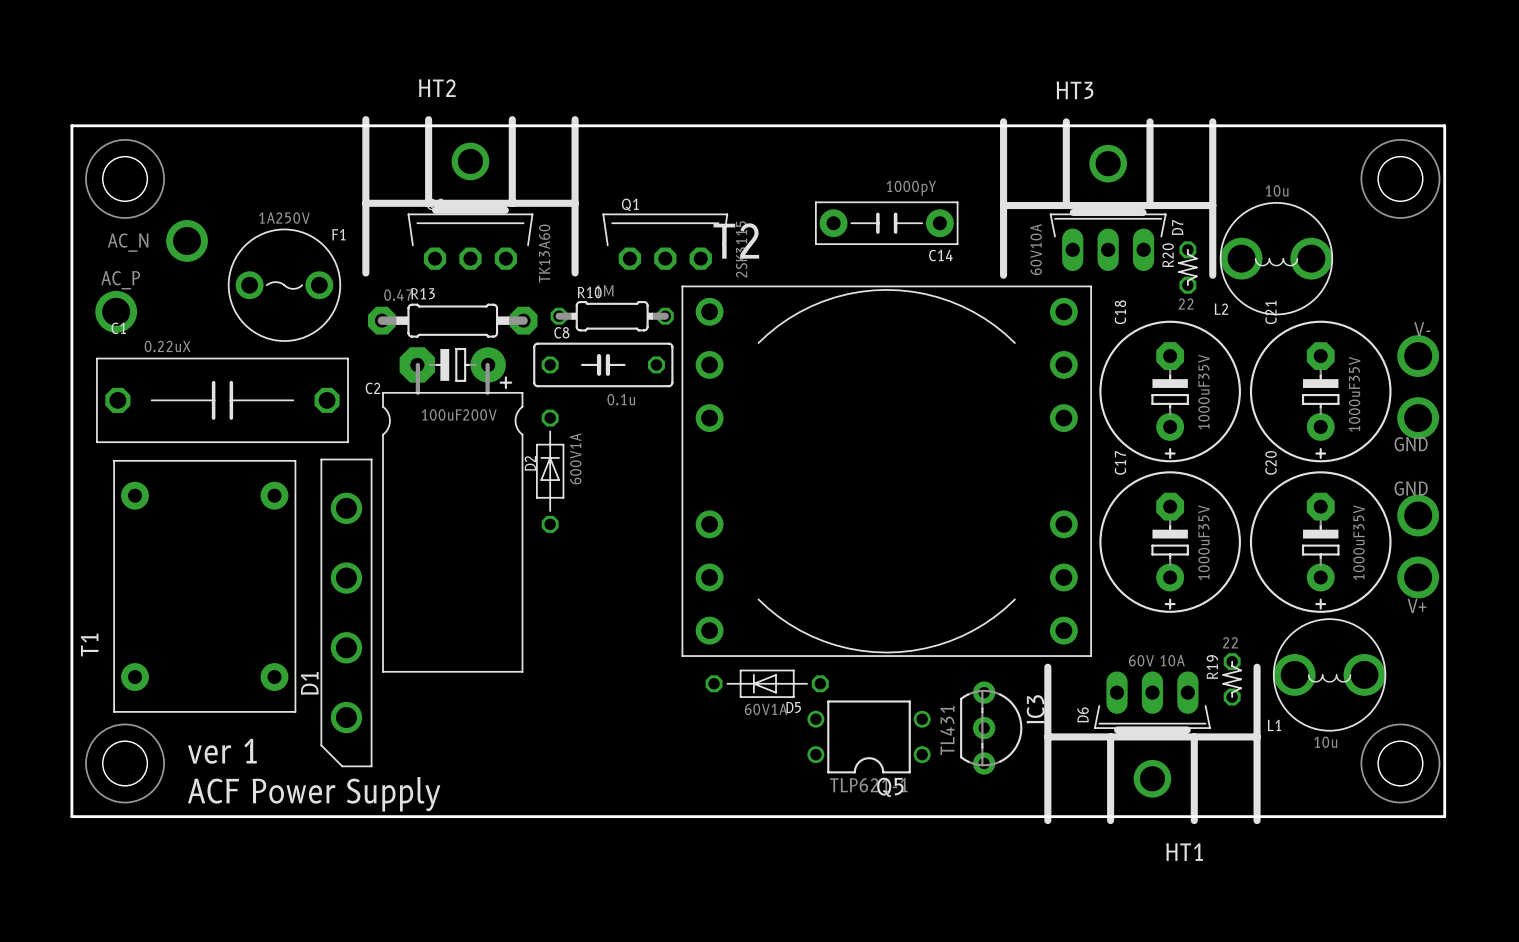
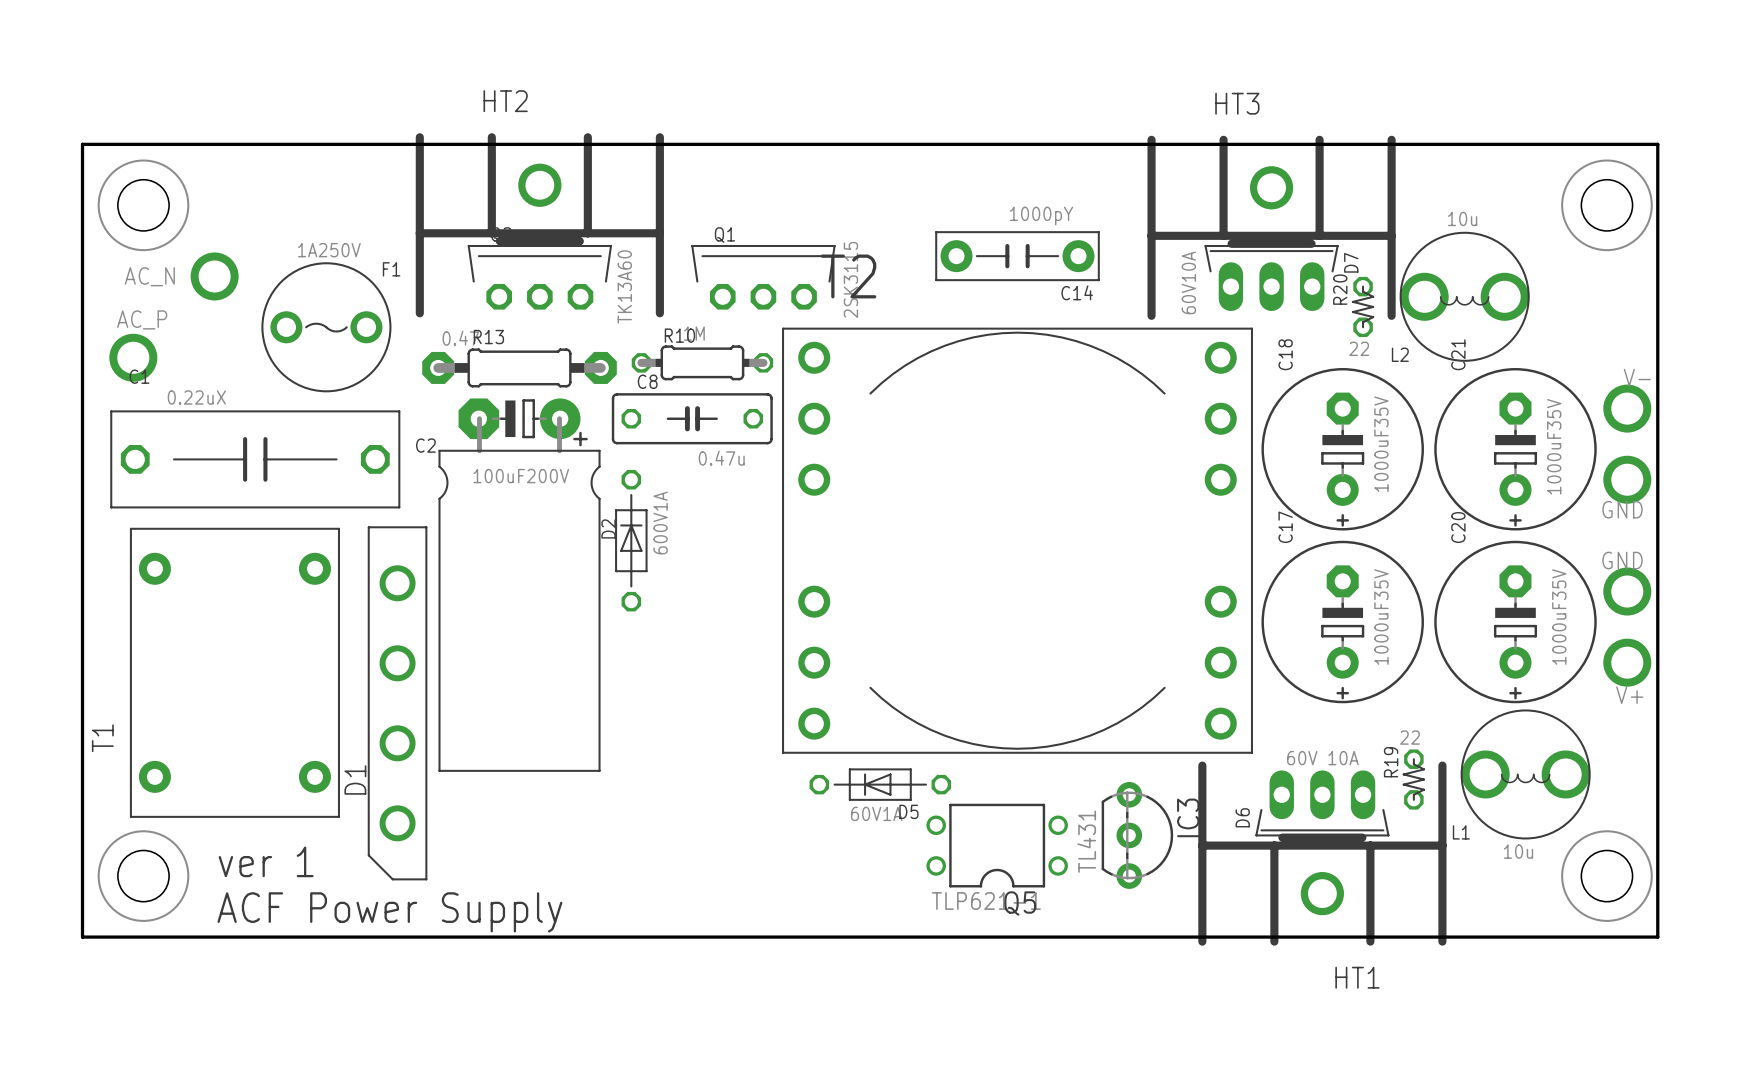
C8 value: 0.1u (621, 399) -> 0.47u (721, 458)

